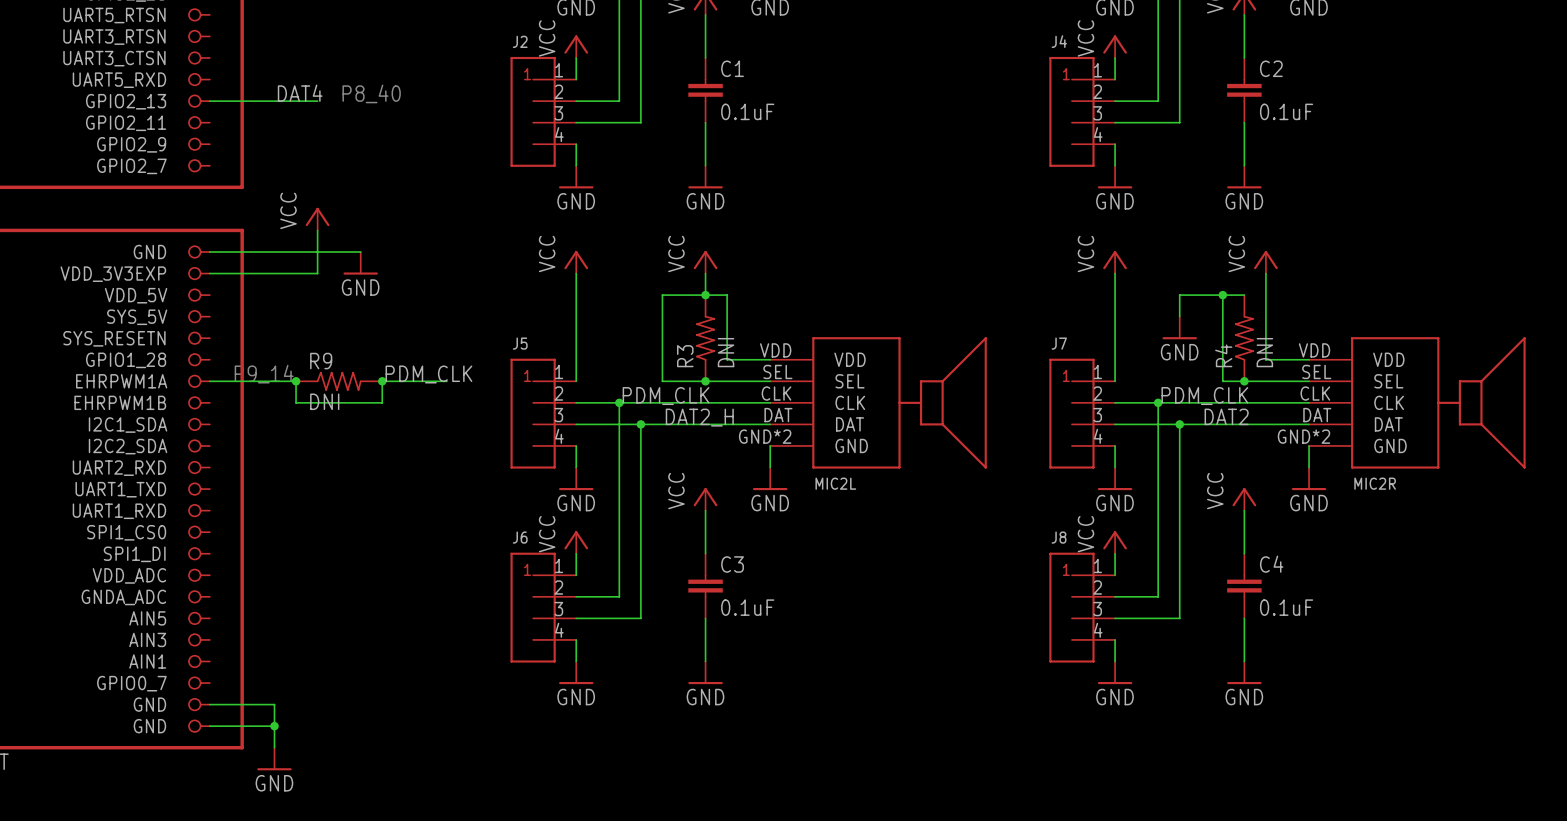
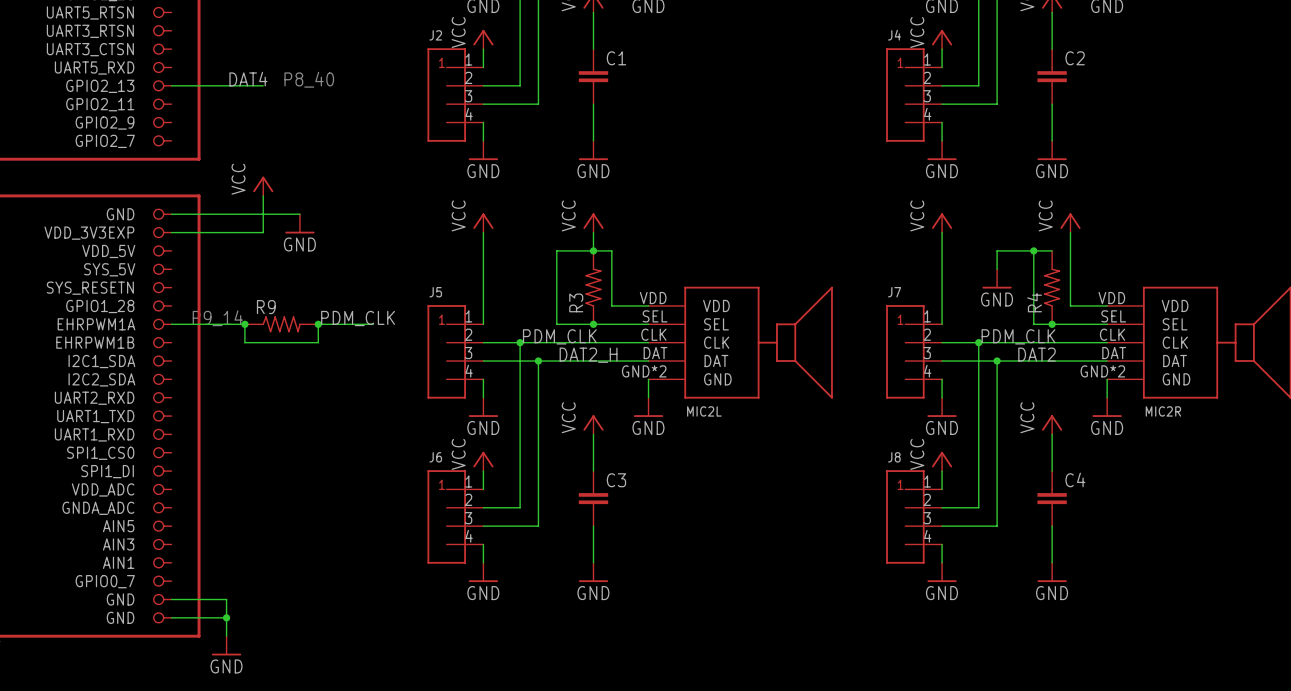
C1 value: 0.1uF (747, 111) -> none
C2 value: 0.1uF (1286, 111) -> none
R3 value: DNI (726, 352) -> none
R4 value: DNI (1264, 352) -> none
R9 value: DNI (324, 401) -> none
C3 value: 0.1uF (747, 607) -> none
C4 value: 0.1uF (1286, 607) -> none

